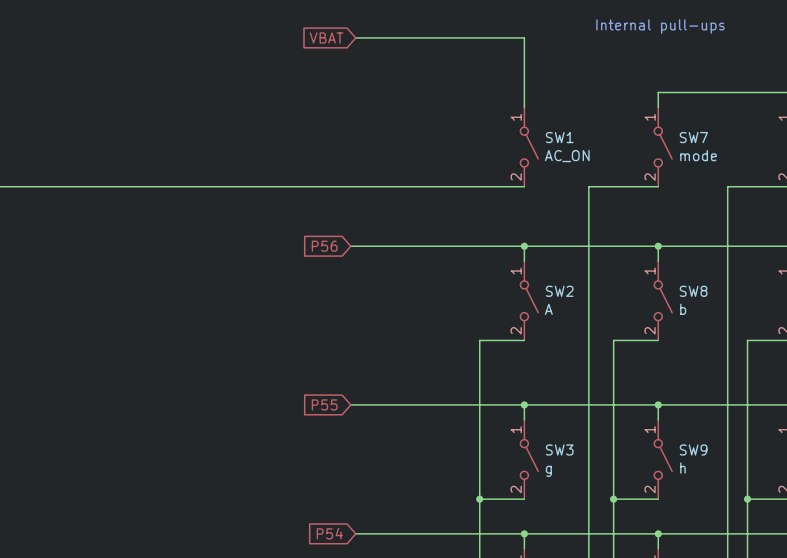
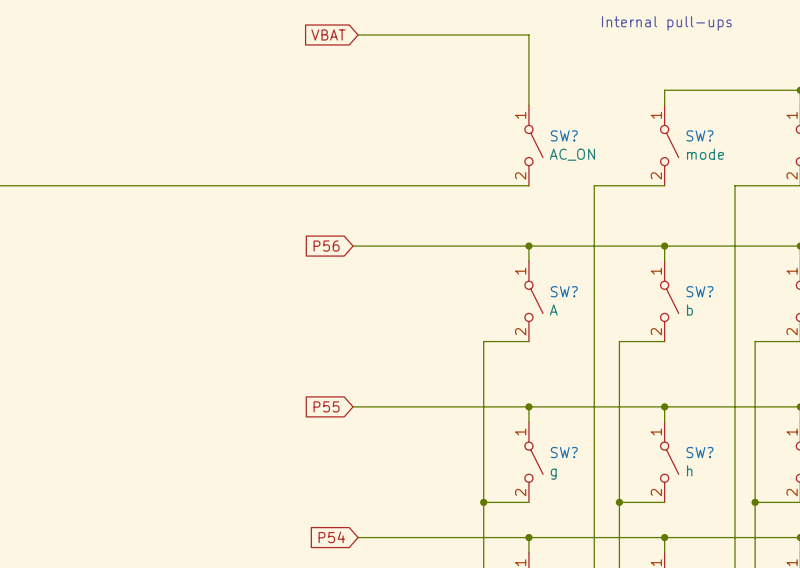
SW1 name: SW1 (559, 137) -> SW? (564, 135)
SW7 name: SW7 (693, 137) -> SW? (699, 135)
SW2 name: SW2 (559, 291) -> SW? (564, 291)
SW8 name: SW8 (693, 291) -> SW? (699, 291)
SW3 name: SW3 (559, 449) -> SW? (564, 452)
SW9 name: SW9 (693, 449) -> SW? (699, 452)

